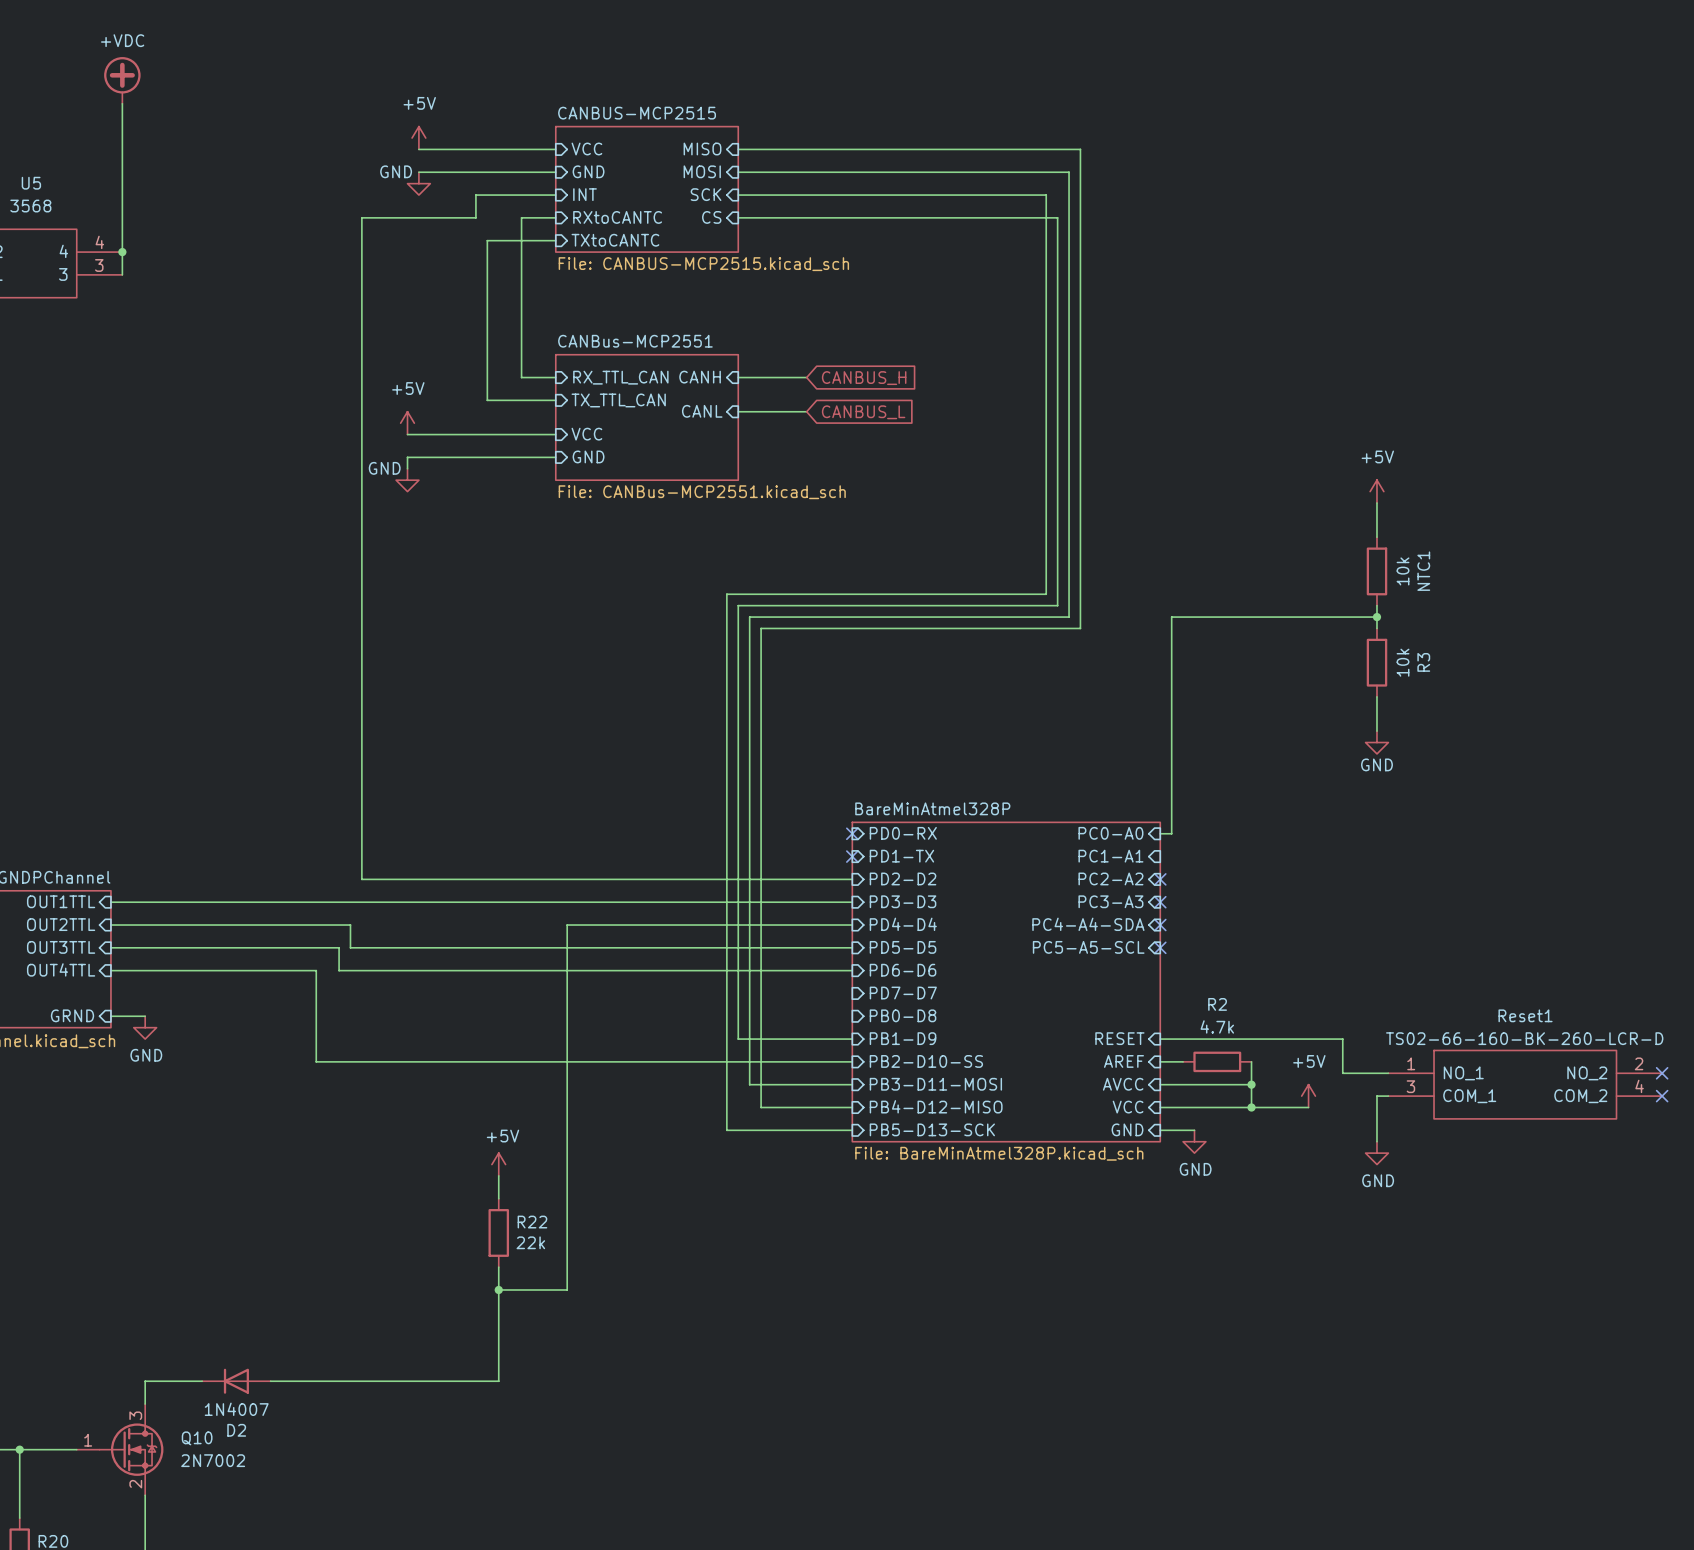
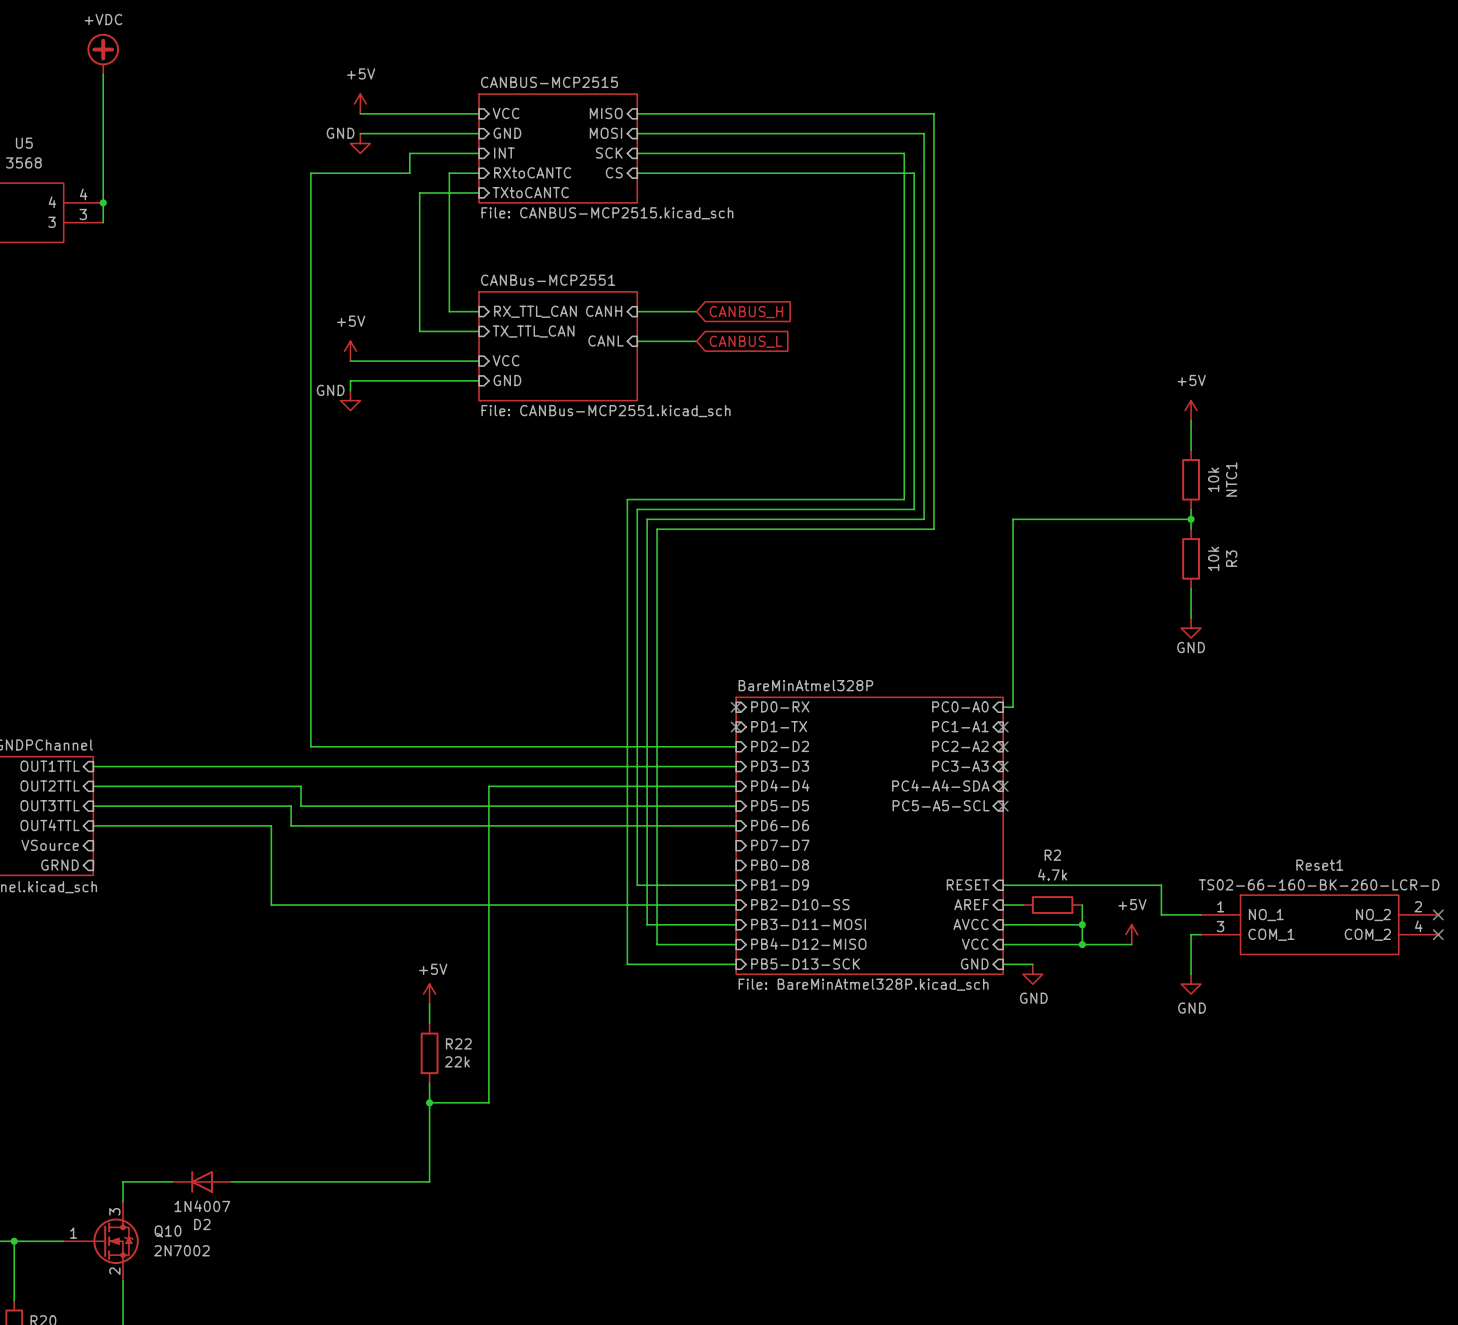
no-connect mark: none -> (1003, 727)
sheet pin: none -> VSource (50, 845)
wire: (110, 1016) (145, 1016) -> none
power symbol: GND (145, 1027) -> none

